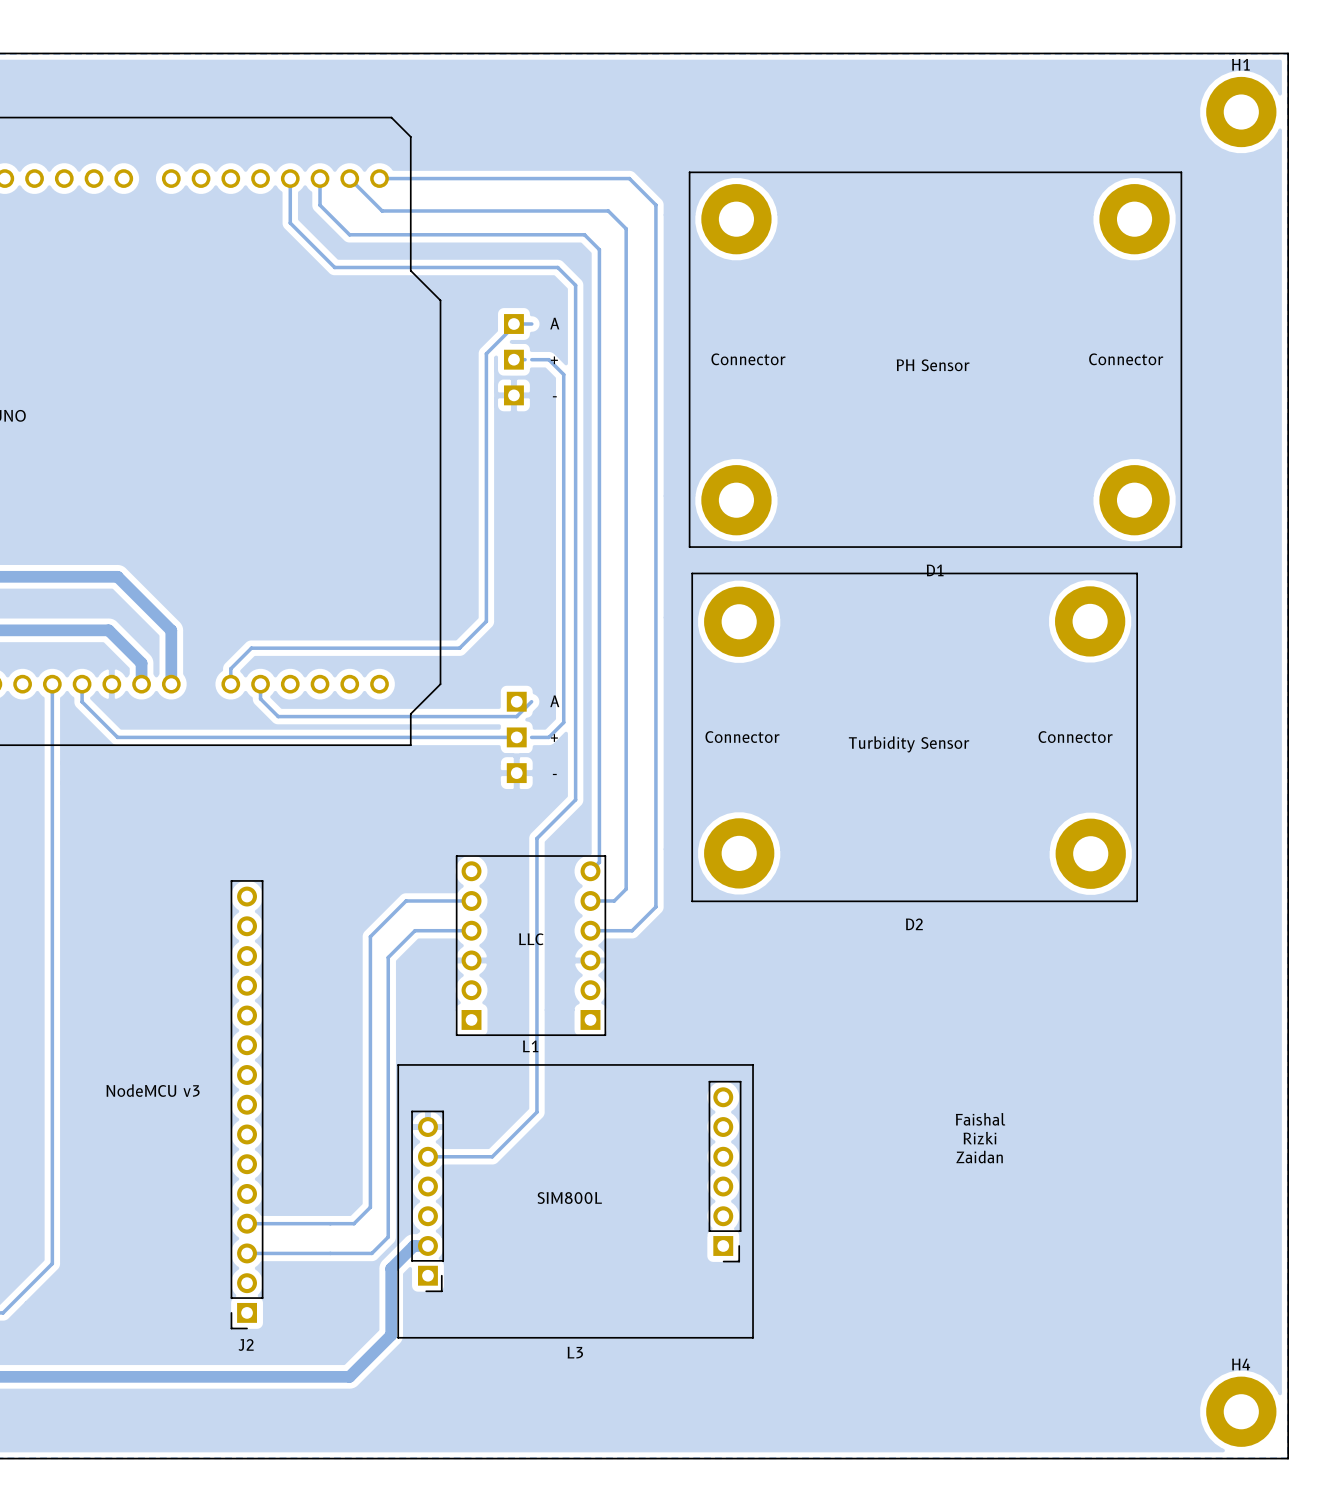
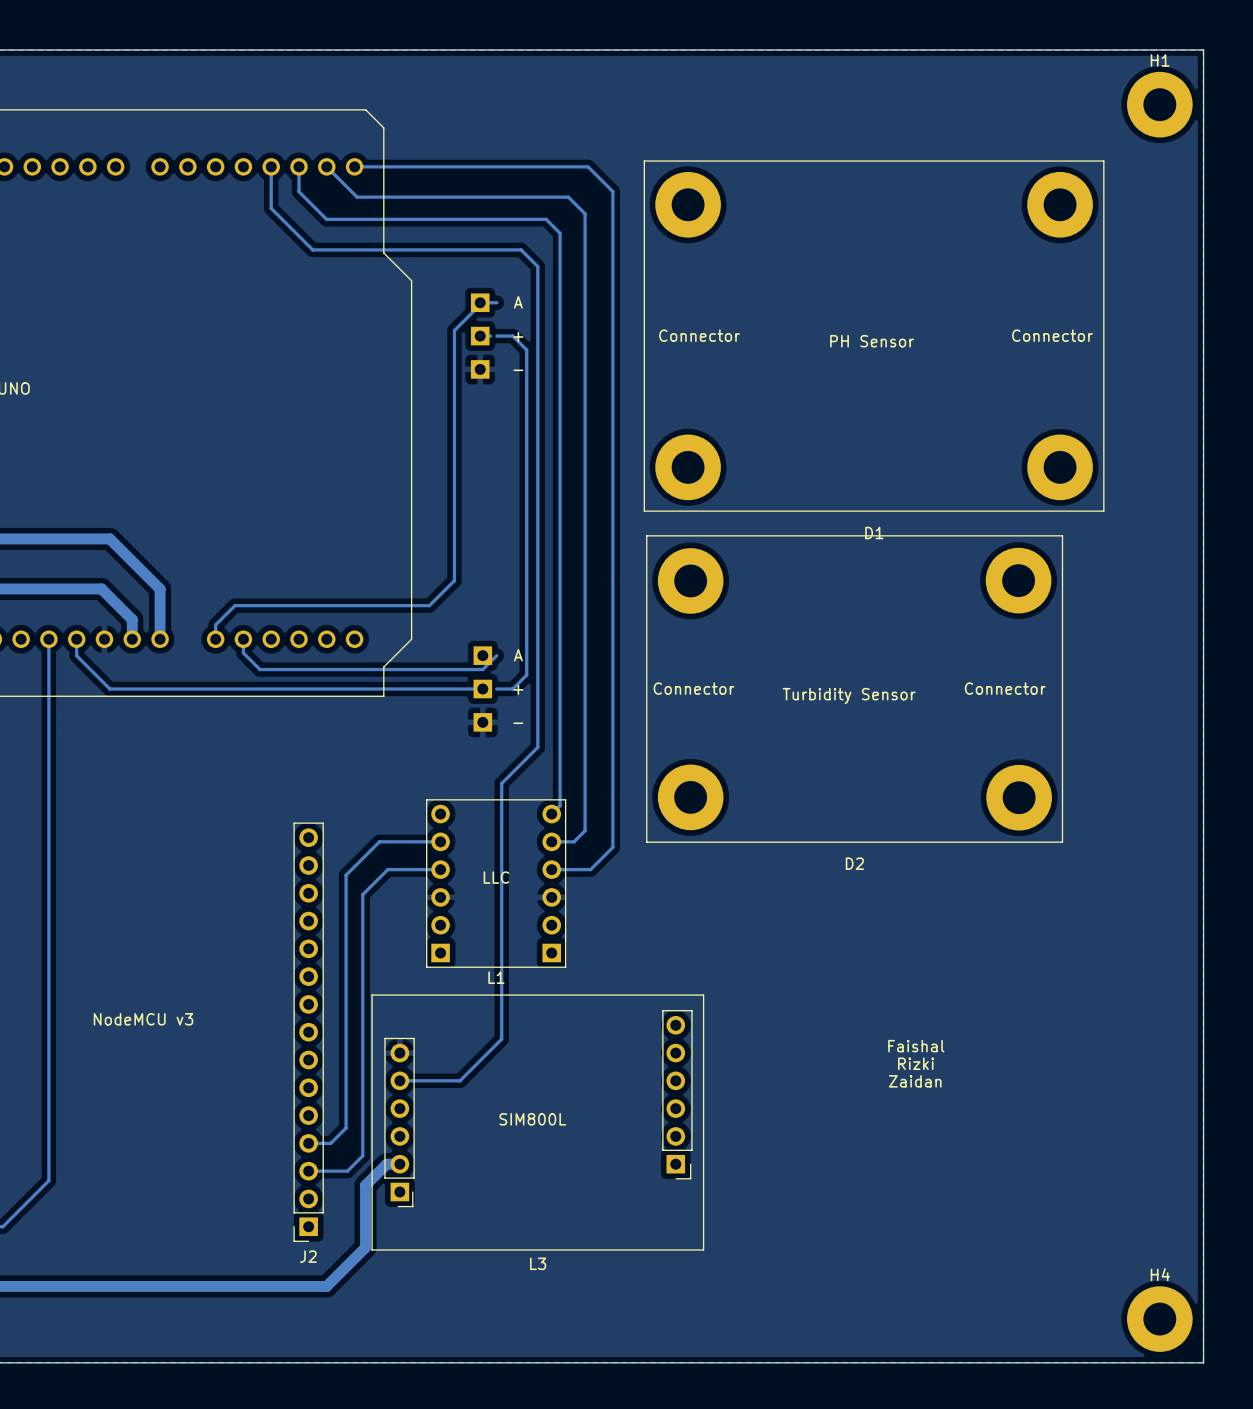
J2 position: (247, 1104) -> (308, 1032)
bottom track: (247, 1223) (330, 1223) -> none
bottom track: (247, 1253) (330, 1253) -> none

